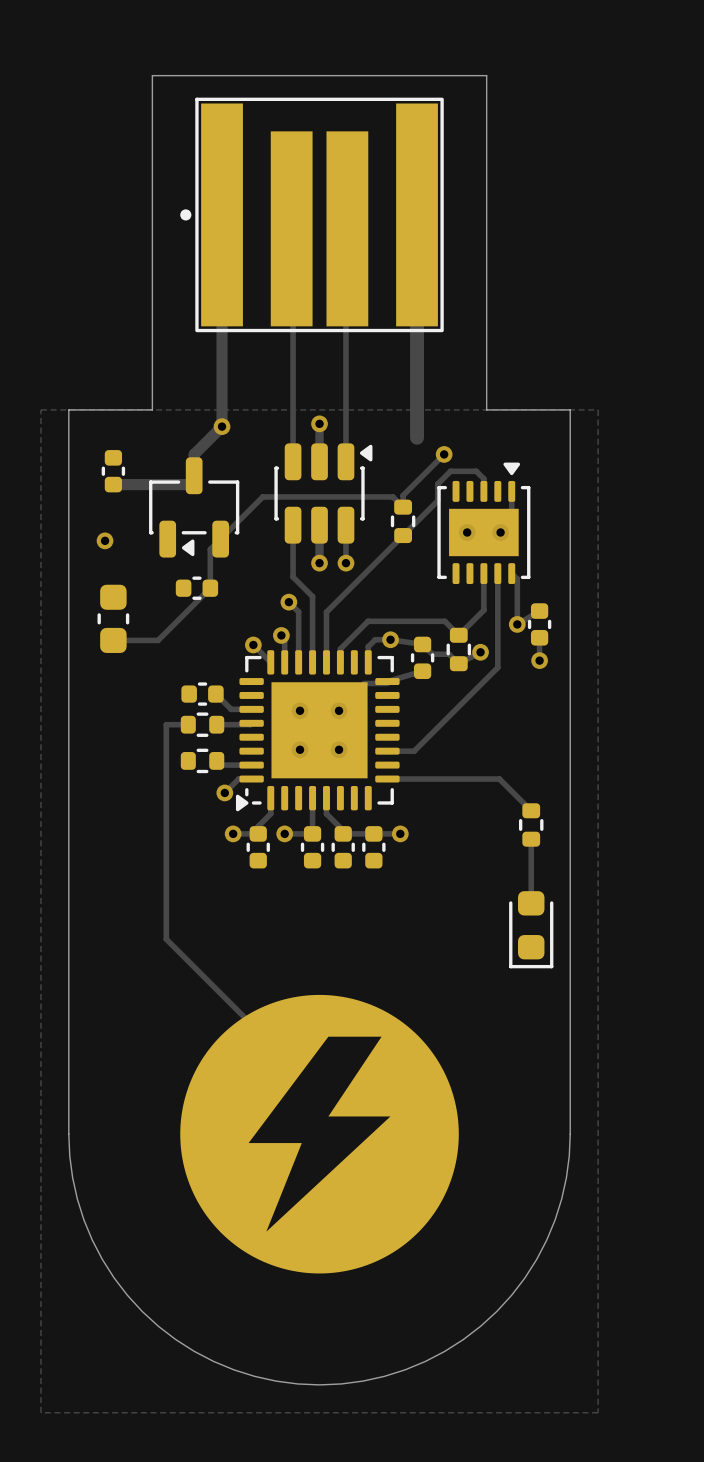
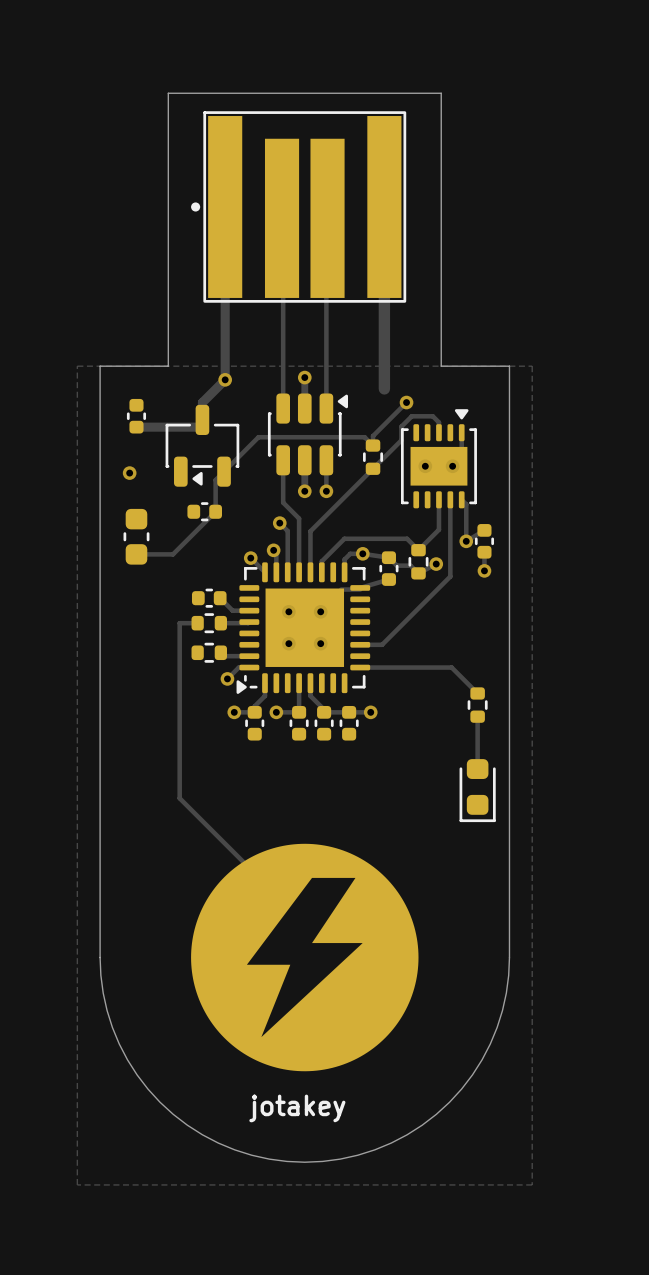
text: none -> jotakey (297, 1108)

